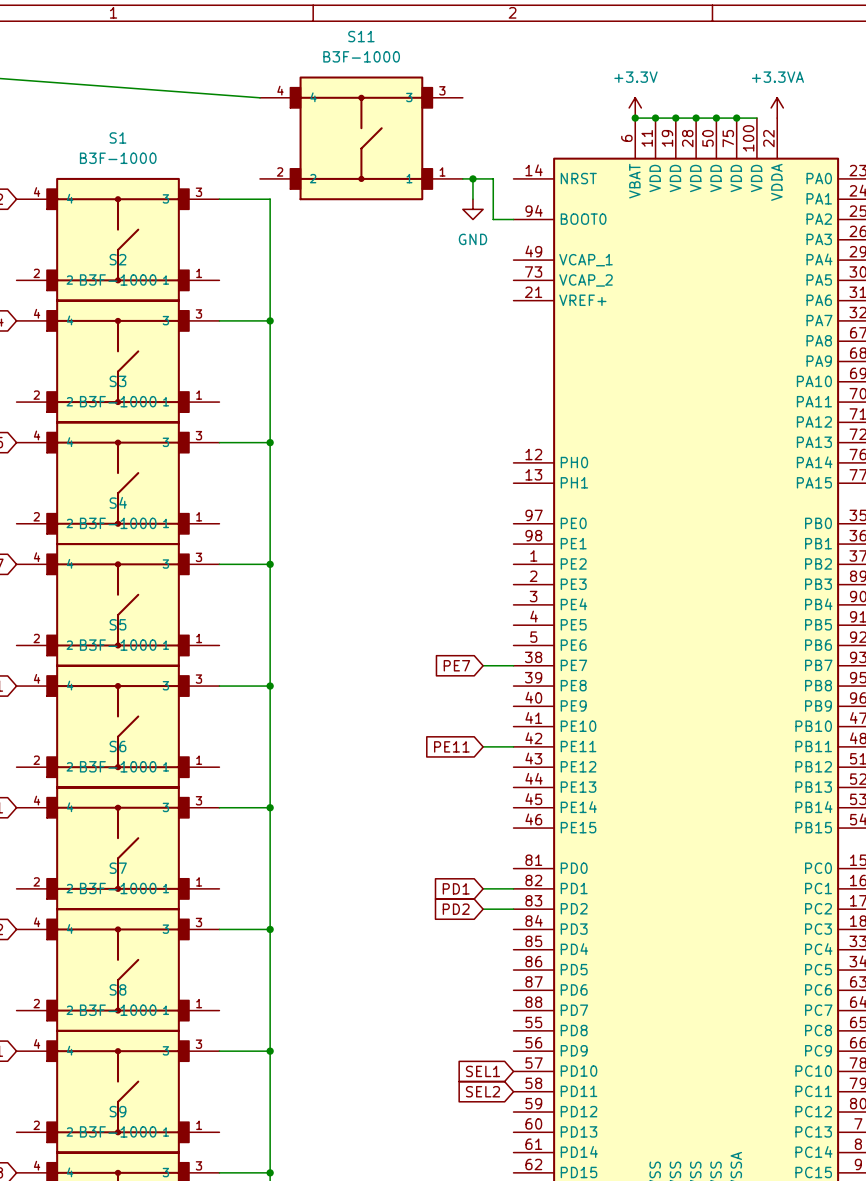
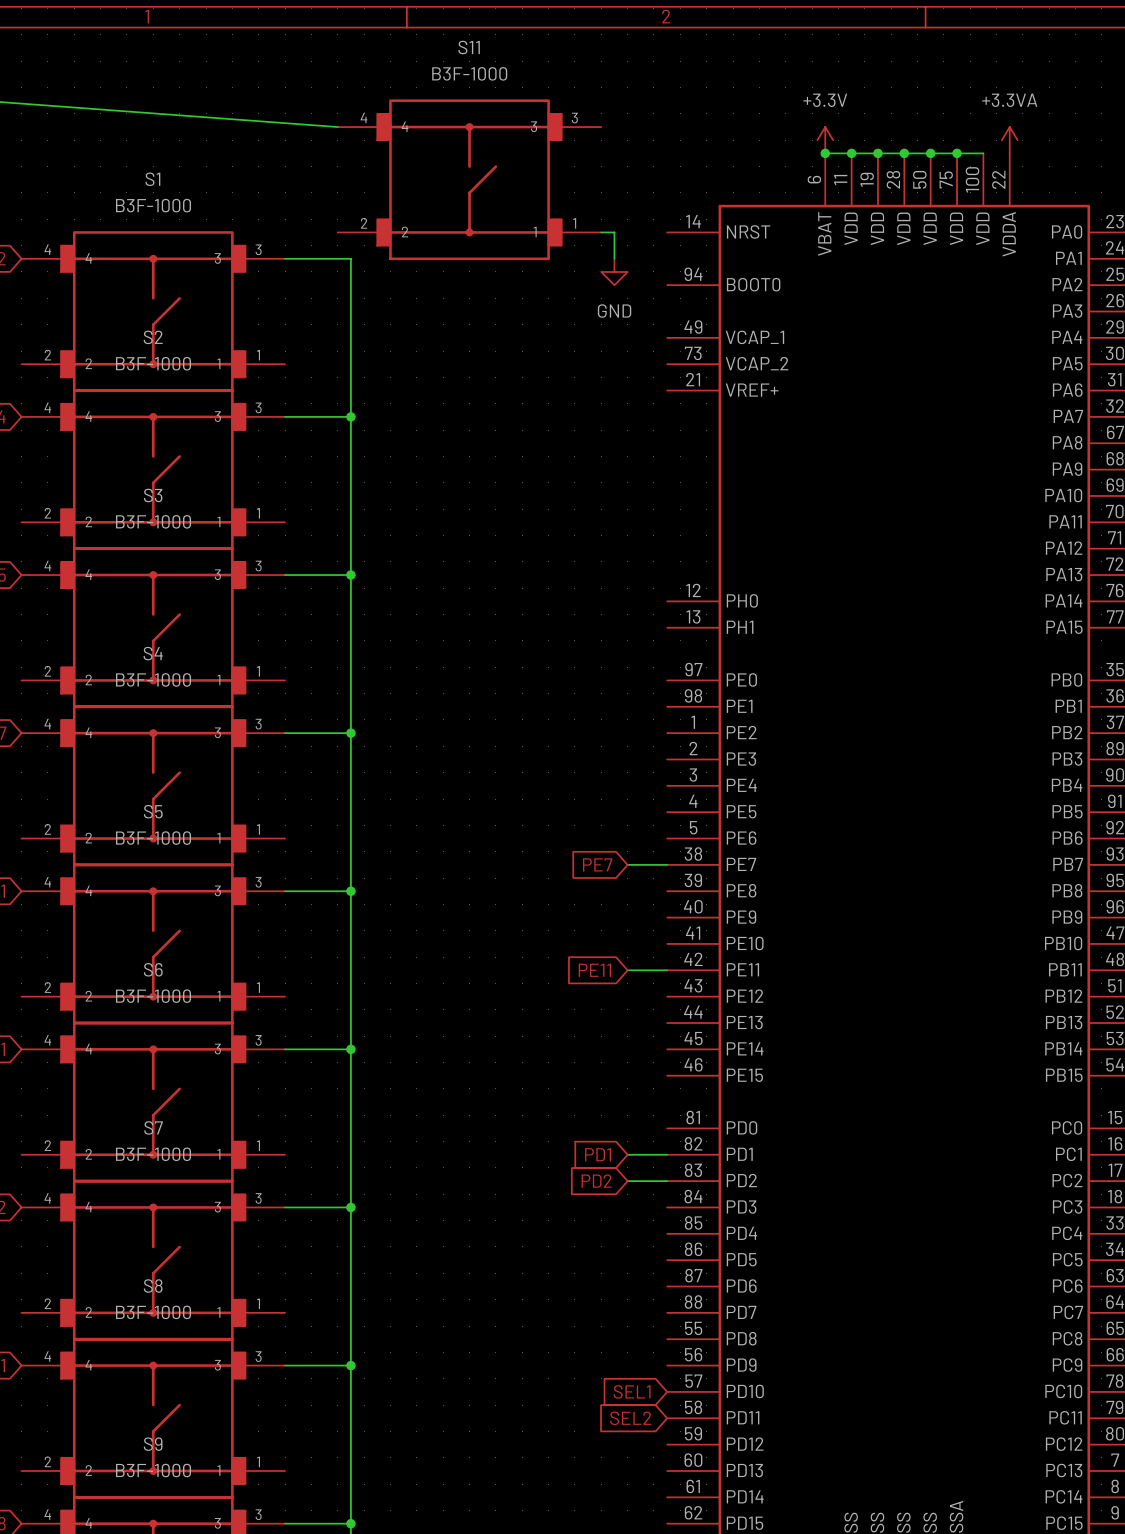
wire: (472, 178) (493, 178) (493, 219) (513, 219) -> none
junction: (472, 178) -> none

